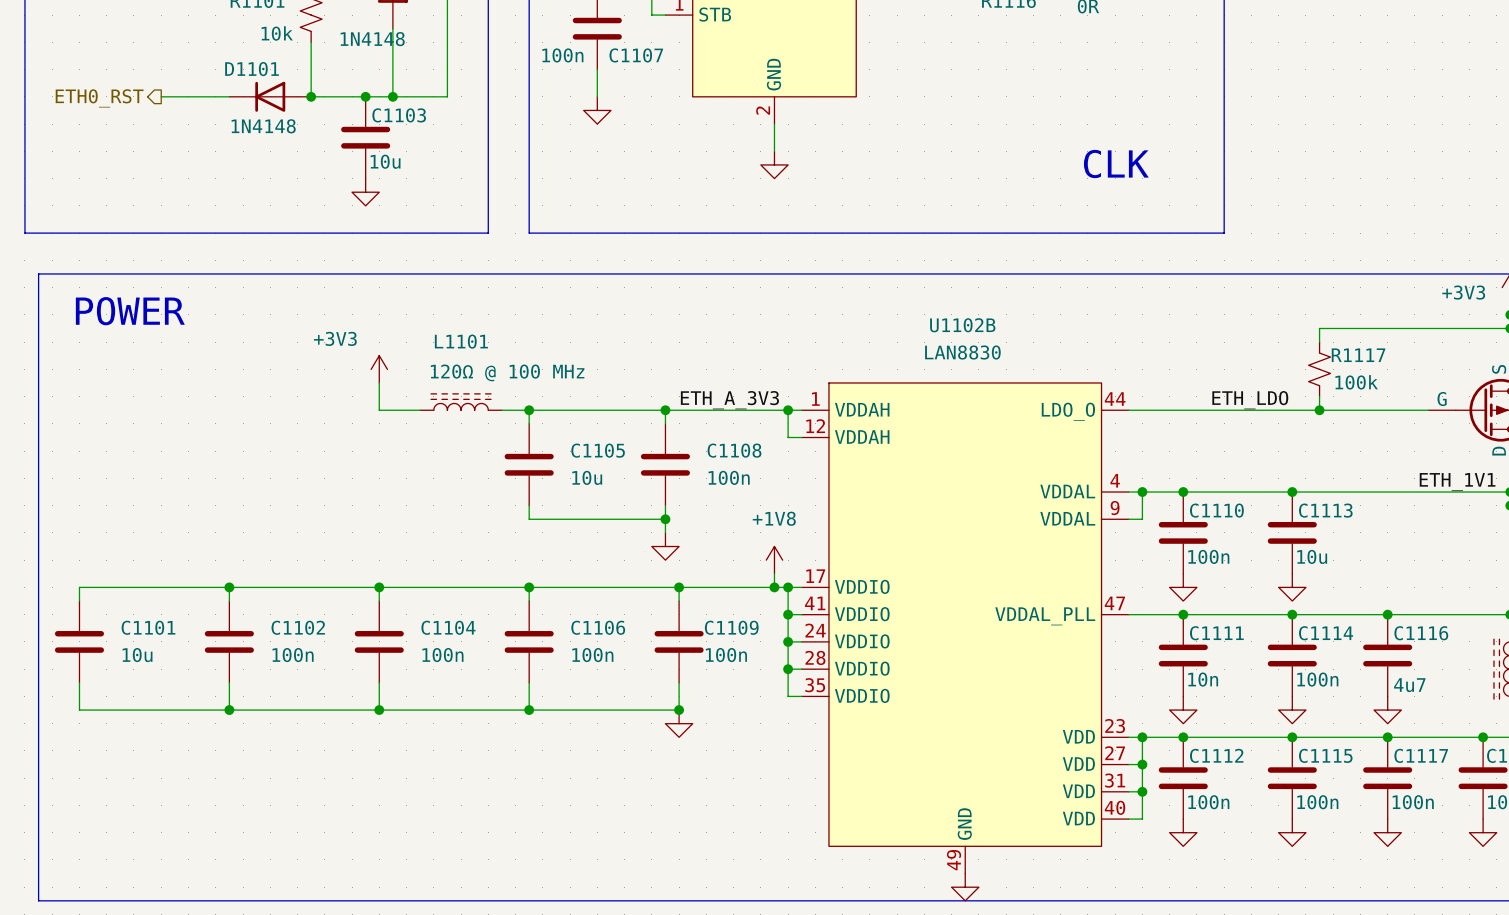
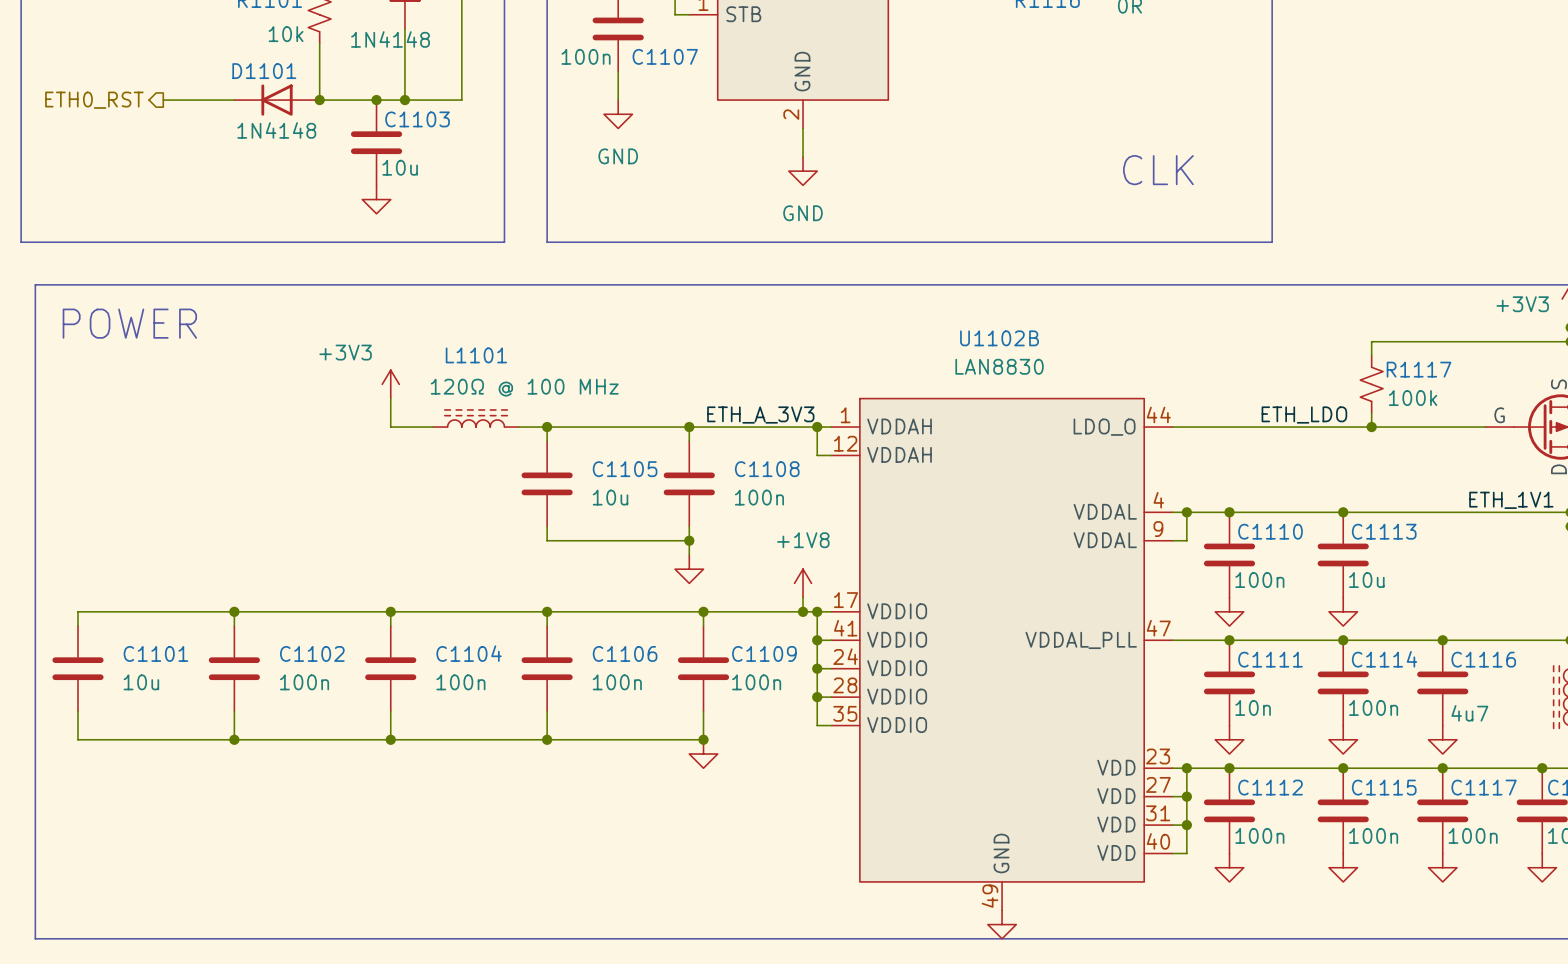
power symbol text: none -> GND (618, 156)
power symbol text: none -> GND (803, 213)

